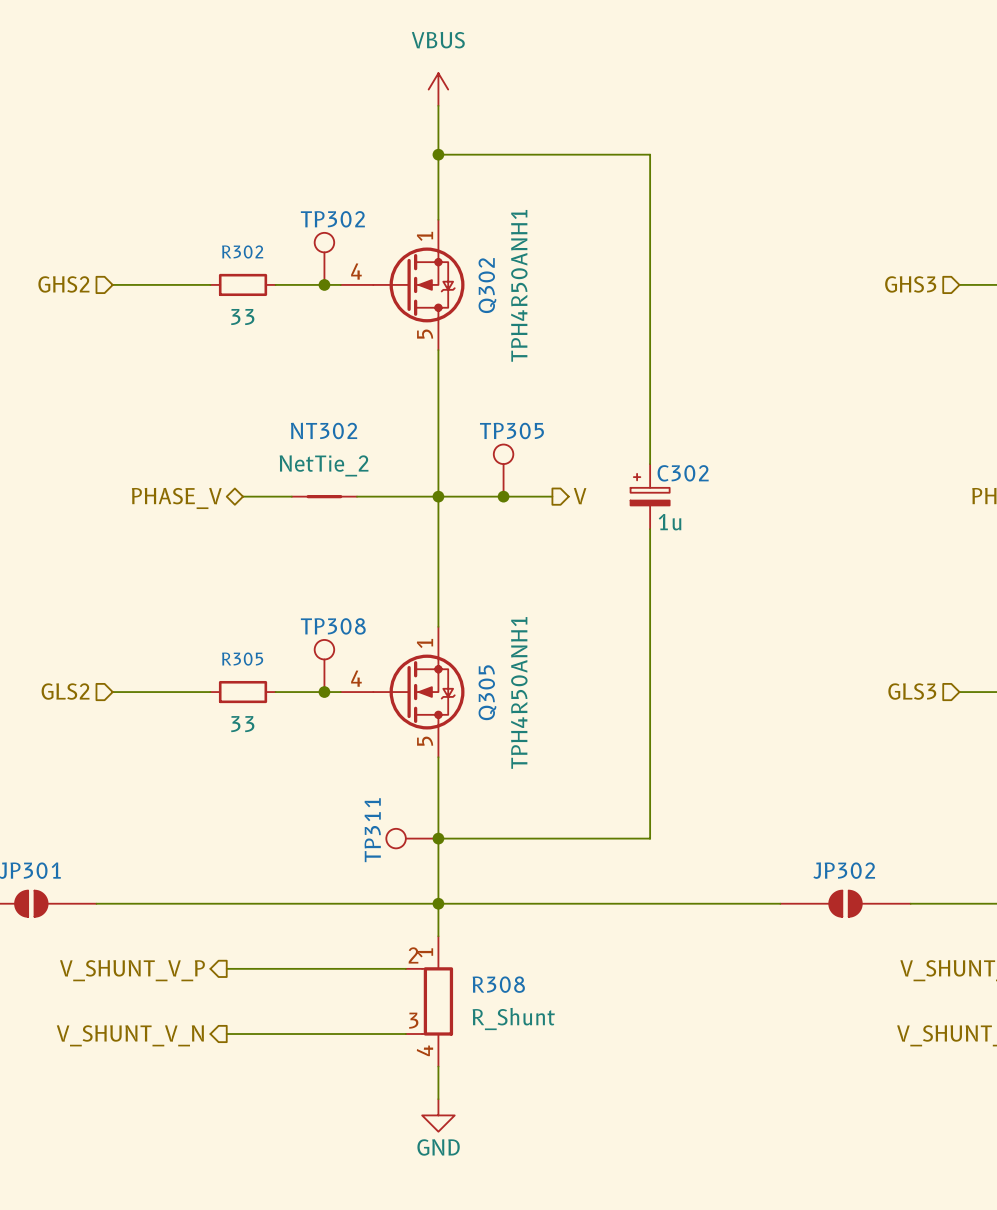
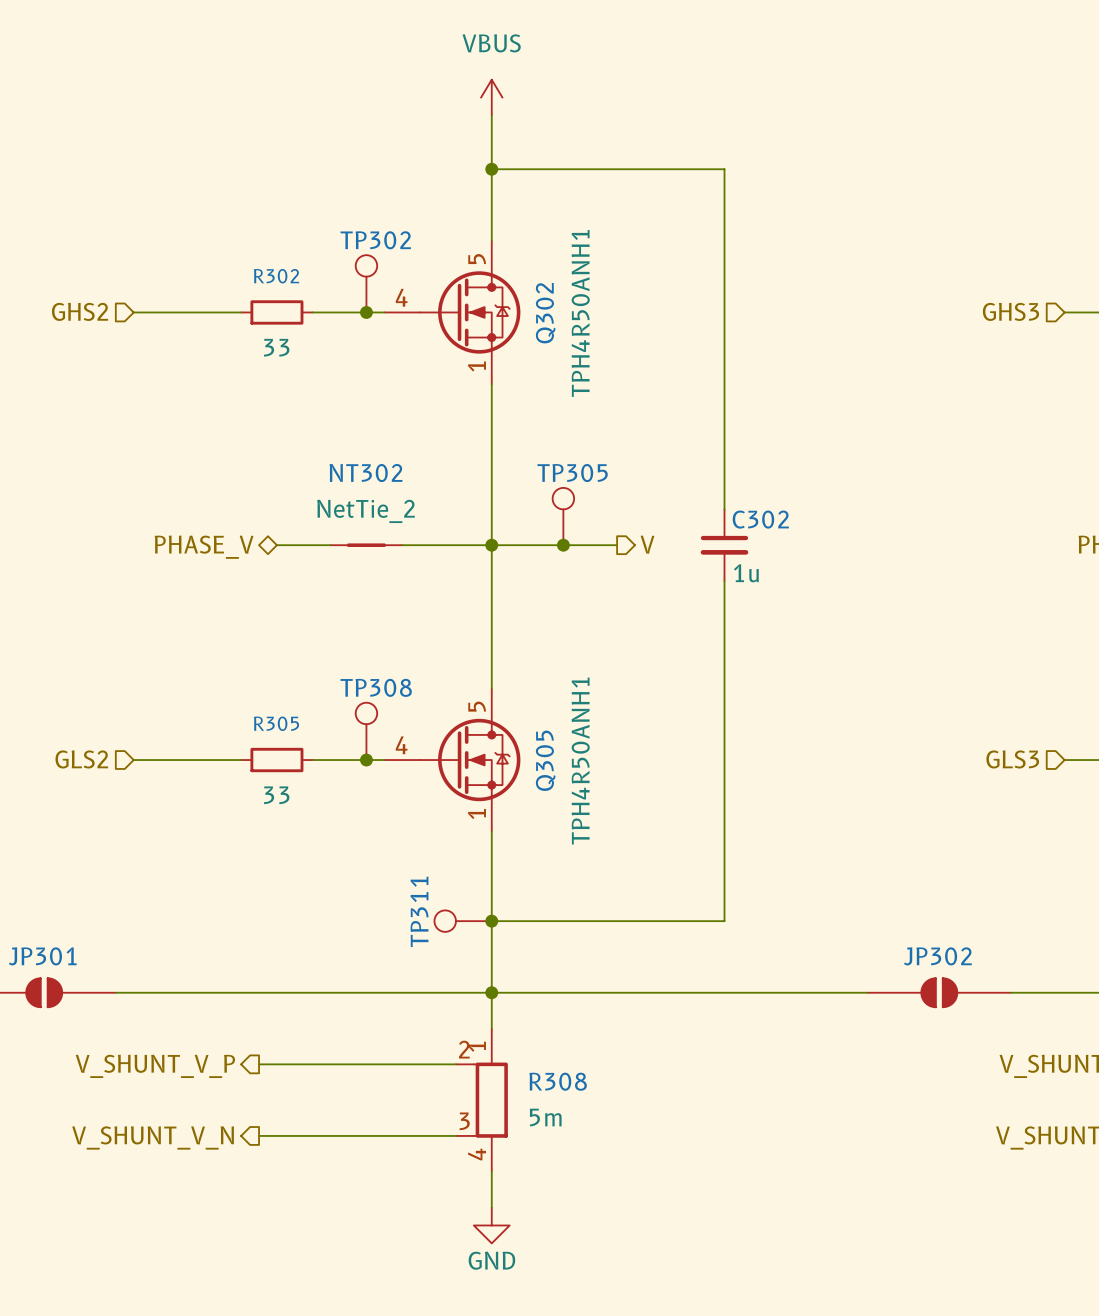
Q302 flip: as is (418, 284) -> up-down (470, 312)
C302 symbol: [630, 464, 670, 530] -> [700, 509, 749, 582]
Q305 flip: as is (418, 692) -> up-down (470, 760)
R308 value: R_Shunt (513, 1019) -> 5m (545, 1117)

